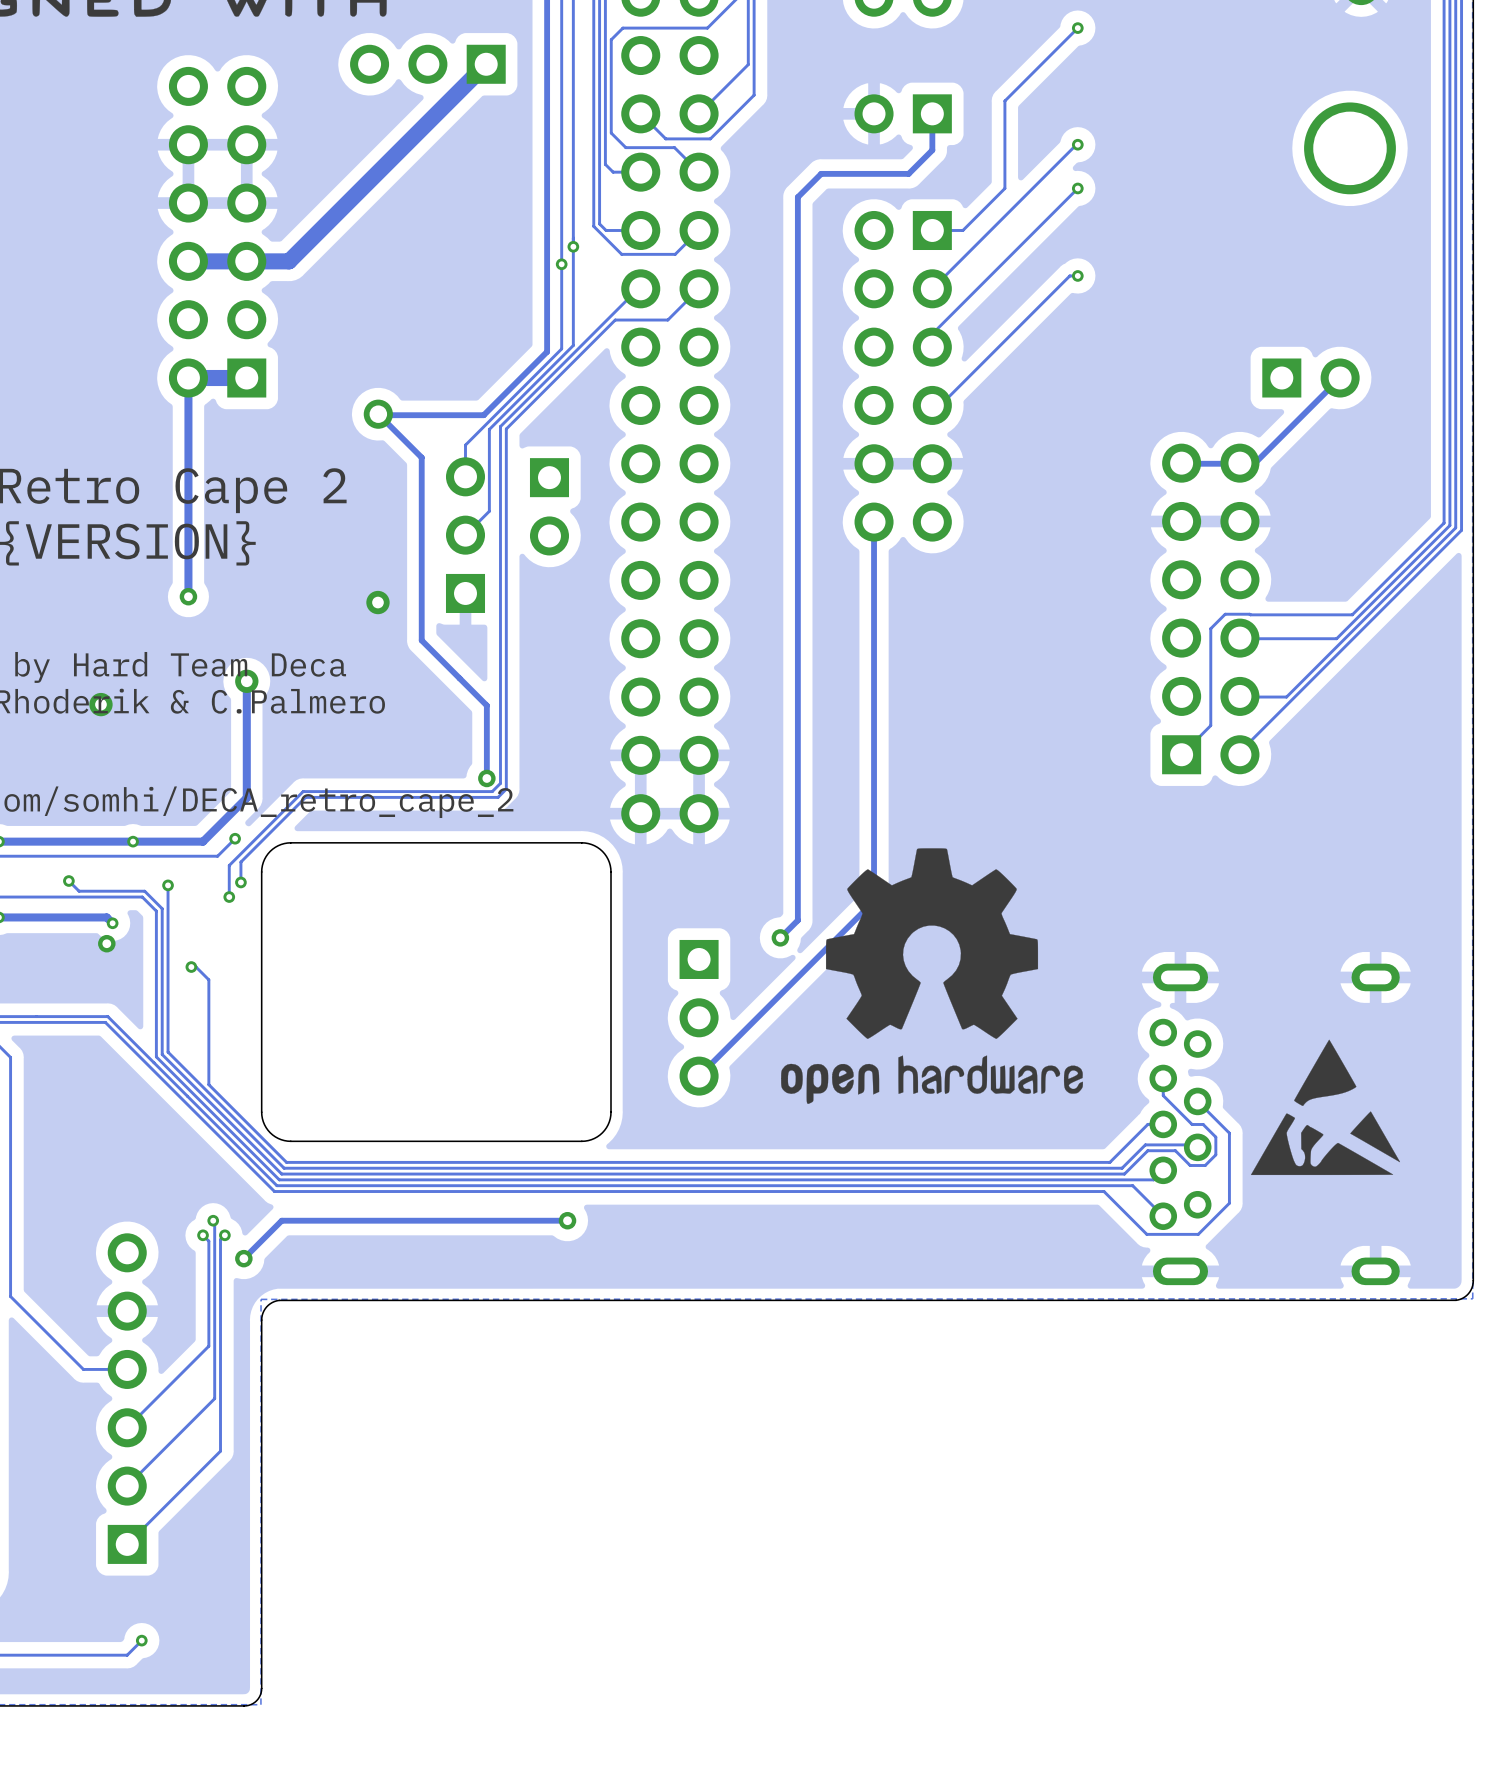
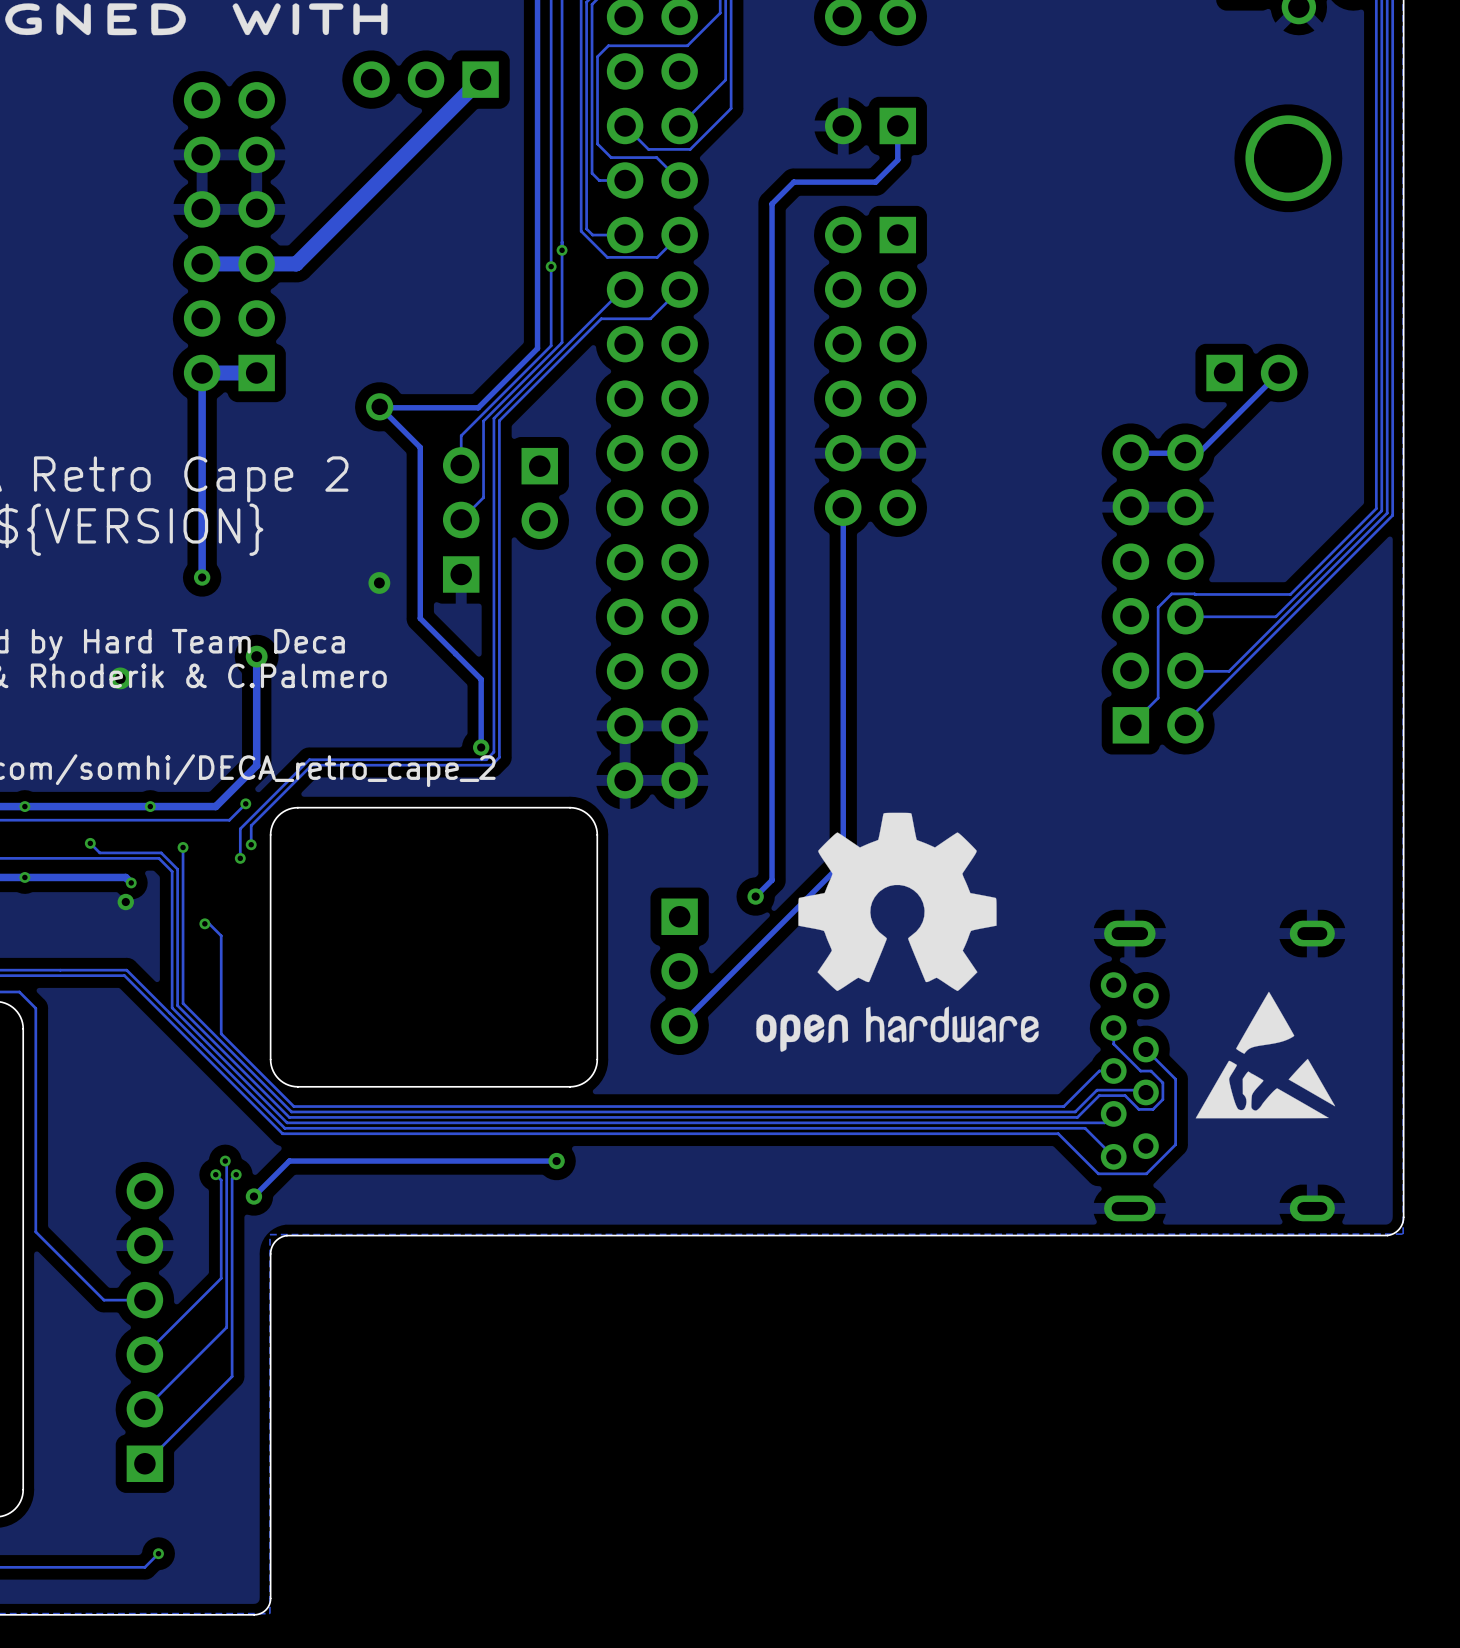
track: (1077, 28) (1004, 100) (1004, 188) (962, 230) (932, 230) -> none
via: (1077, 28) -> none
track: (1077, 144) (932, 288) -> none
via: (1077, 144) -> none
track: (1077, 188) (932, 333) (932, 347) -> none
via: (1077, 188) -> none
track: (1077, 275) (1069, 275) (940, 405) (932, 405) -> none
via: (1077, 275) -> none

